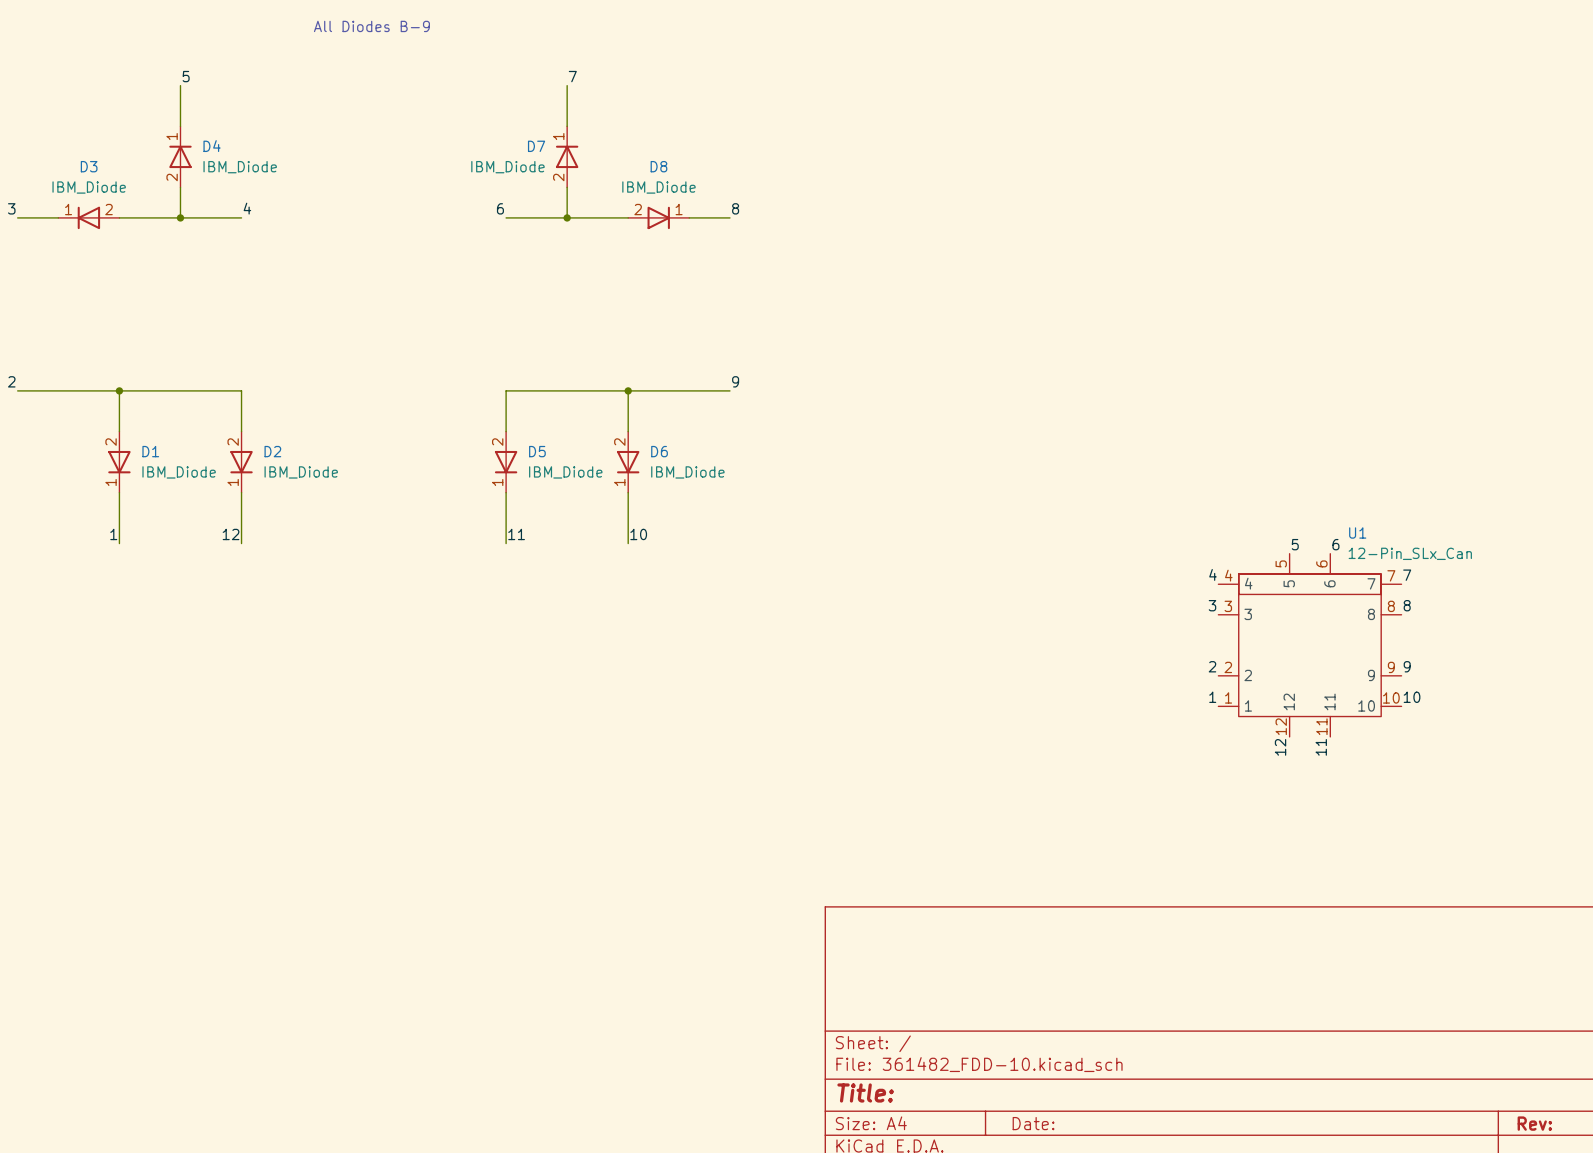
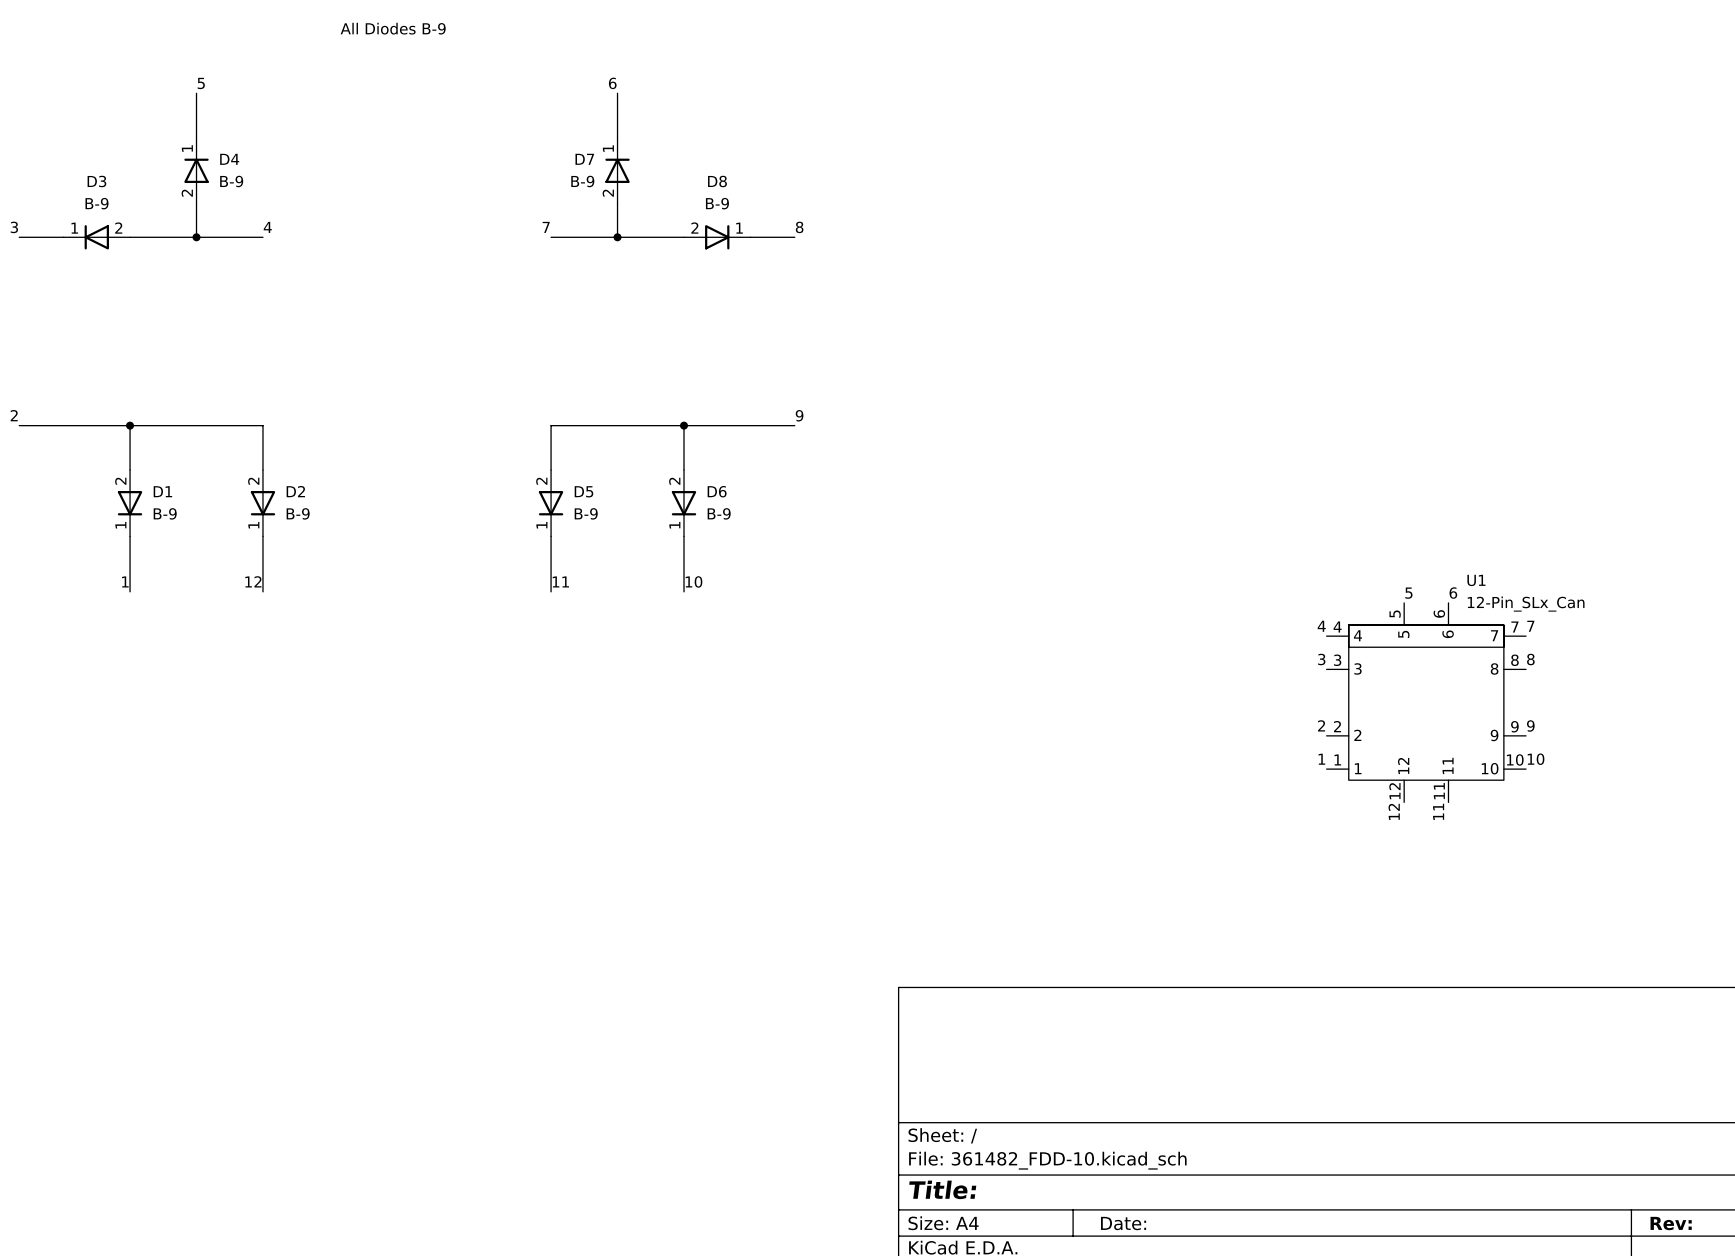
label: 7 (572, 76) -> 6 (612, 83)
D4 value: IBM_Diode (240, 167) -> B-9 (231, 181)
D7 value: IBM_Diode (507, 167) -> B-9 (582, 181)
D3 value: IBM_Diode (89, 187) -> B-9 (97, 203)
D8 value: IBM_Diode (658, 187) -> B-9 (717, 203)
label: 6 (500, 208) -> 7 (546, 227)
D1 value: IBM_Diode (179, 472) -> B-9 (165, 513)
D2 value: IBM_Diode (301, 472) -> B-9 (298, 513)
D5 value: IBM_Diode (565, 472) -> B-9 (586, 513)
D6 value: IBM_Diode (687, 472) -> B-9 (719, 513)

